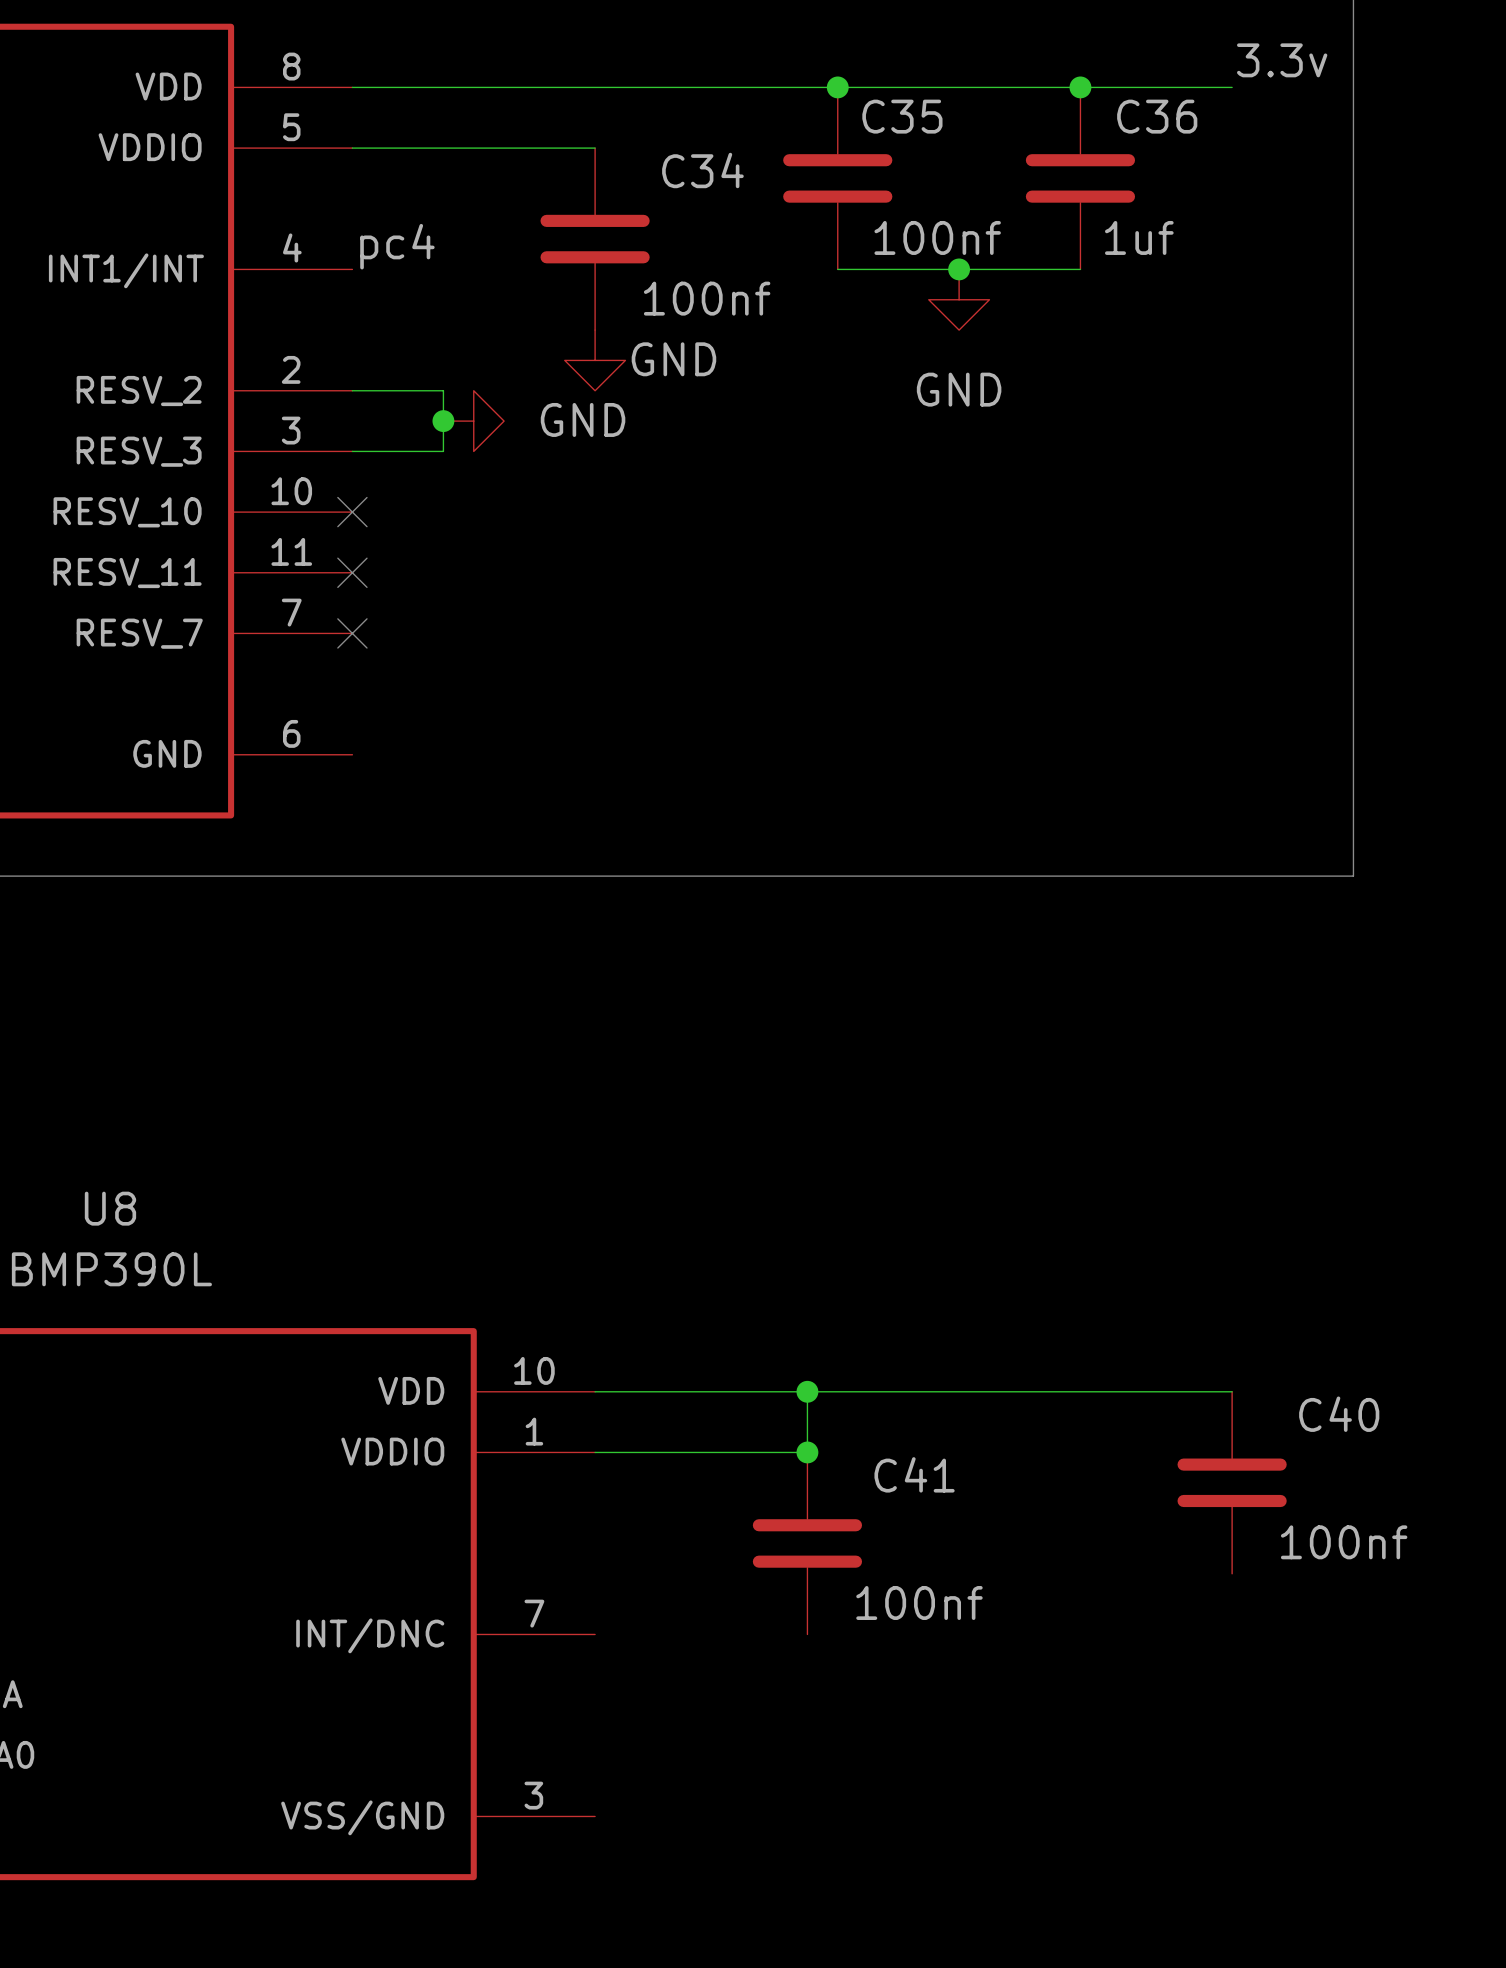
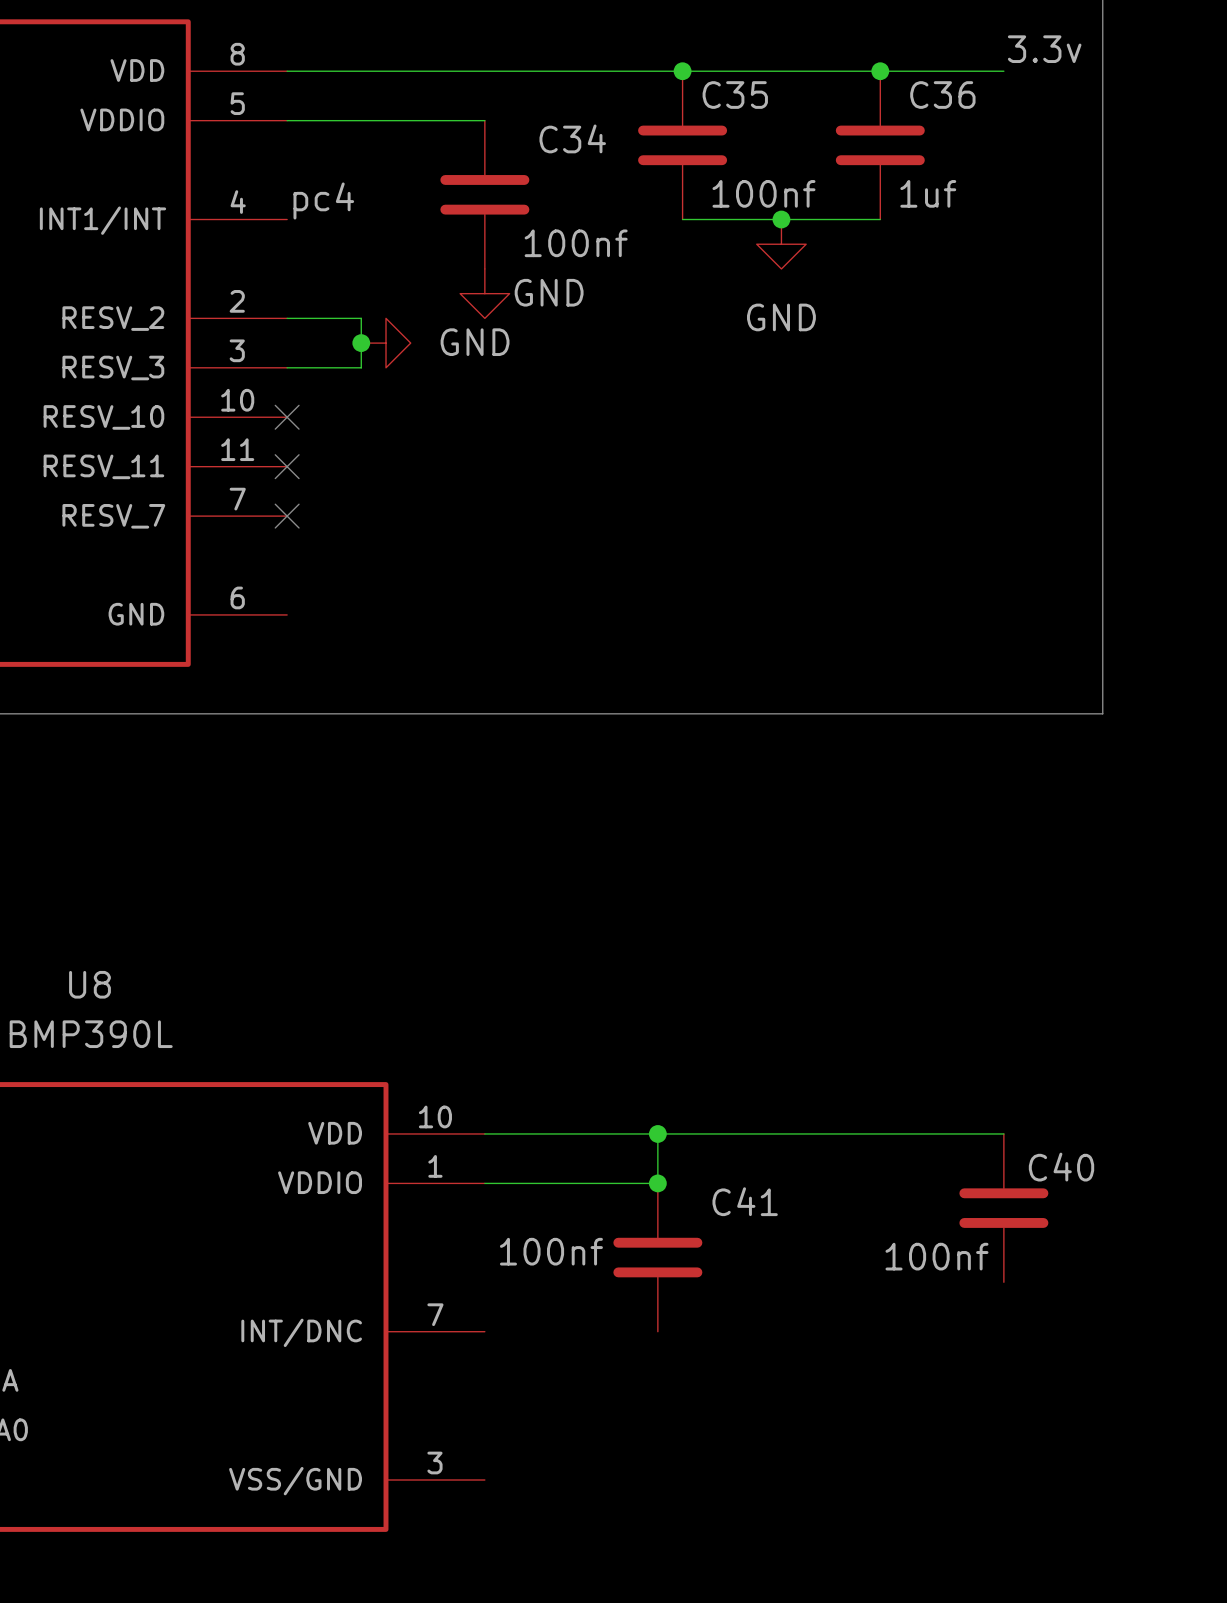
C40 name position: C40 (1339, 1414) -> C40 (1061, 1167)
C40 value position: 100nf (1344, 1542) -> 100nf (936, 1256)
C41 value position: 100nf (919, 1602) -> 100nf (551, 1251)

